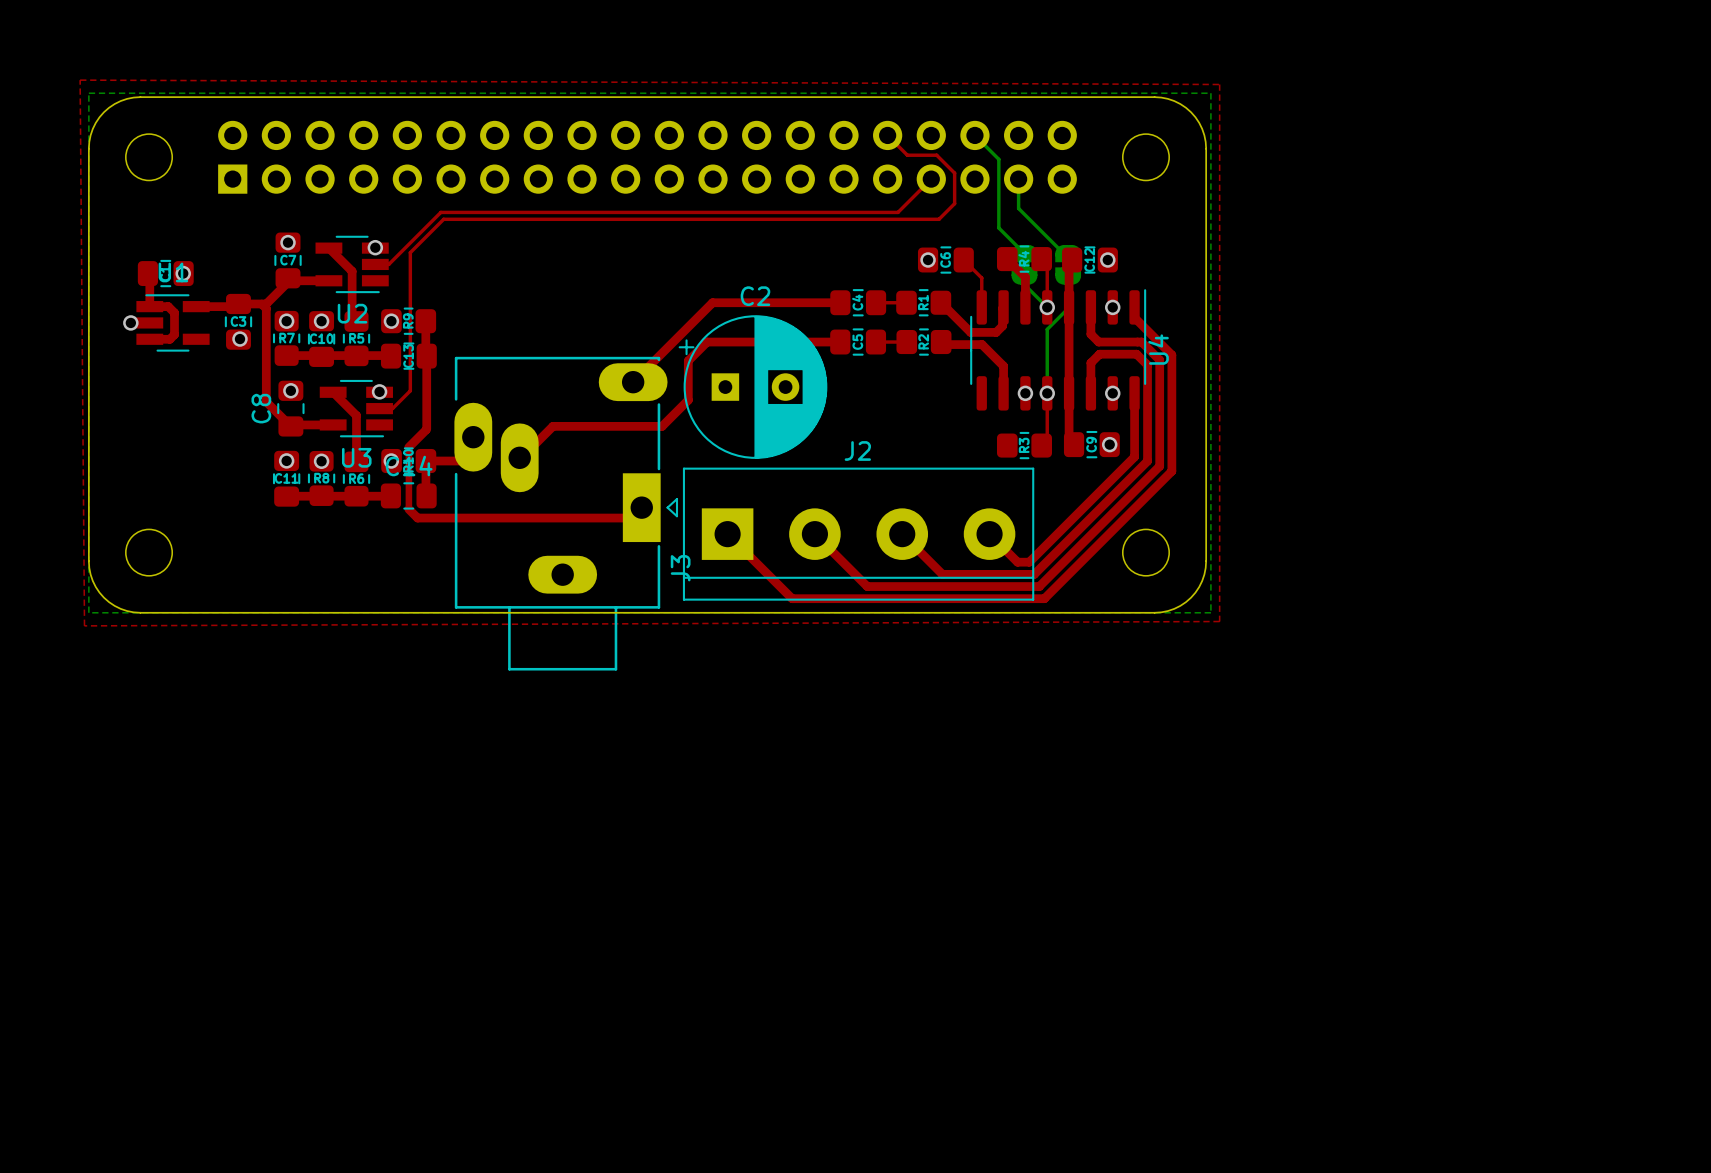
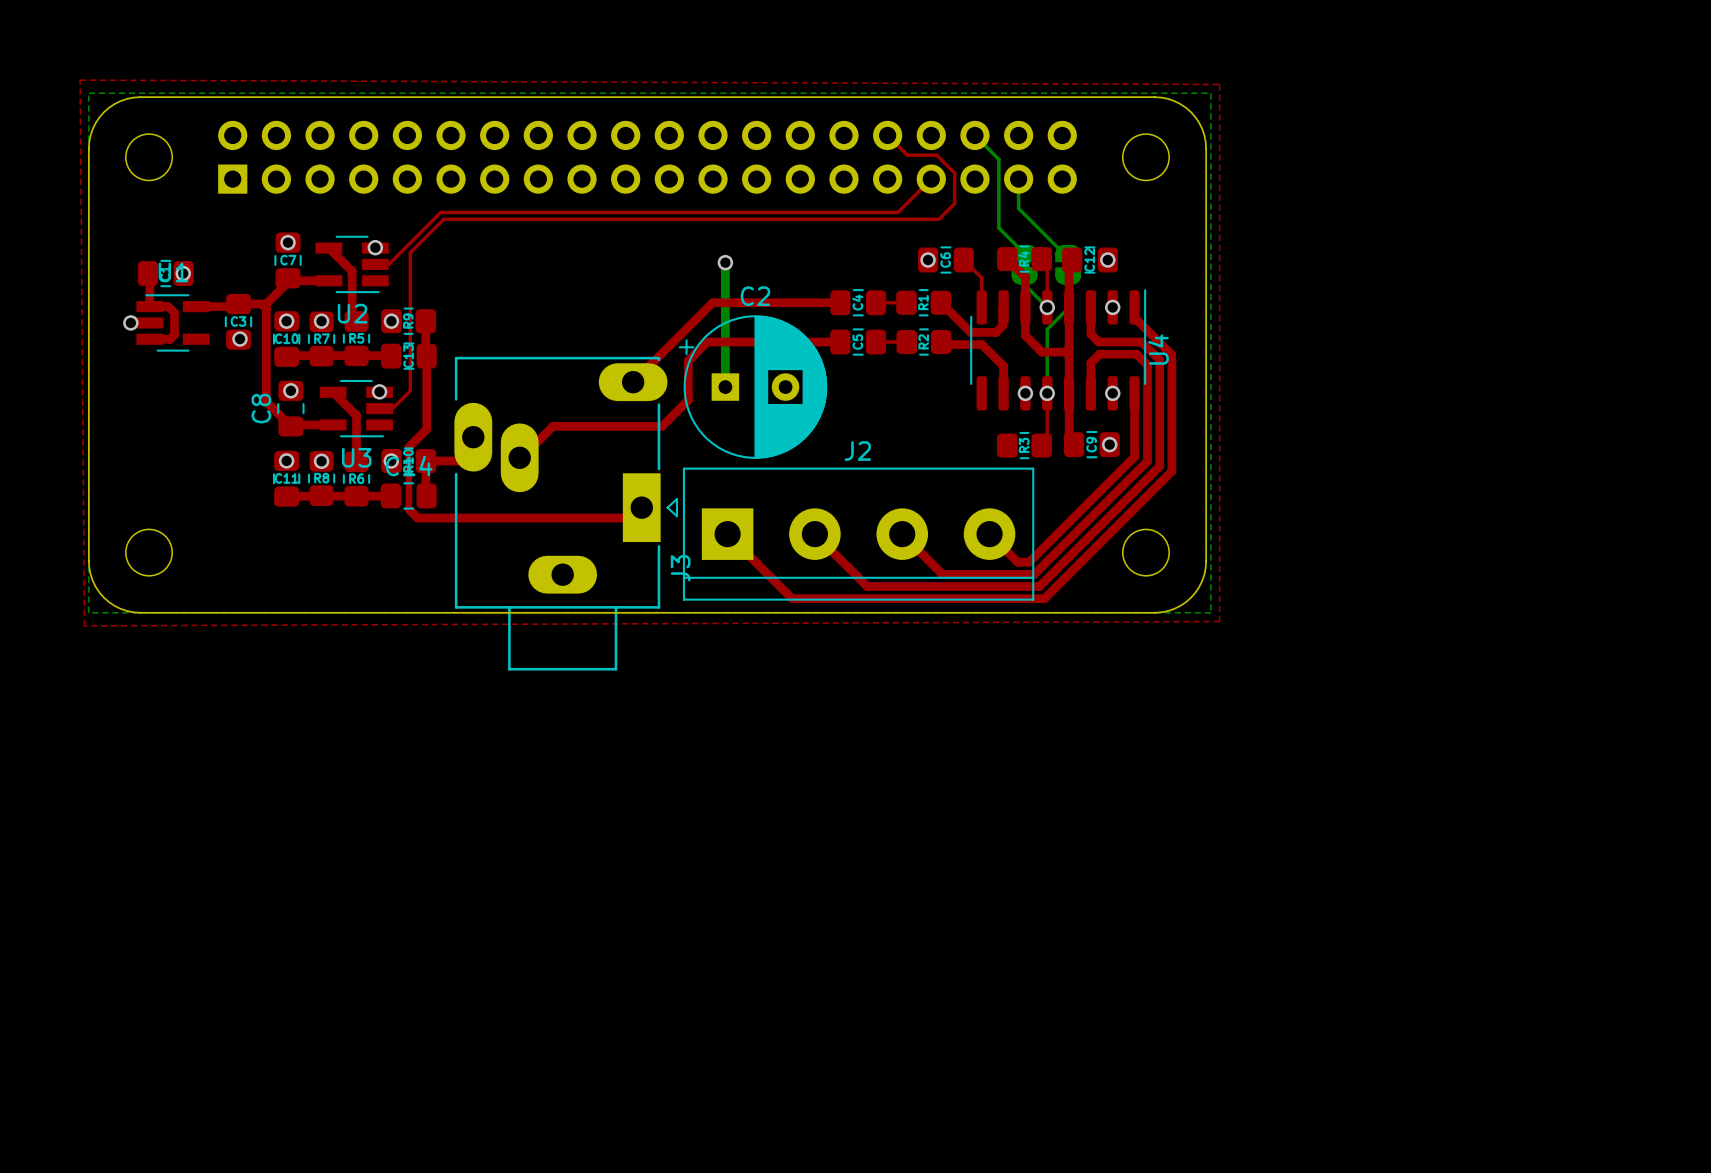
bottom track: none -> (725, 262) (725, 387)
via: none -> (725, 262)
top track: none -> (1025, 307) (1025, 335) (1041, 352) (1065, 352) (1069, 348)
R7 position: (286, 338) -> (321, 339)
C10 position: (321, 339) -> (286, 339)

